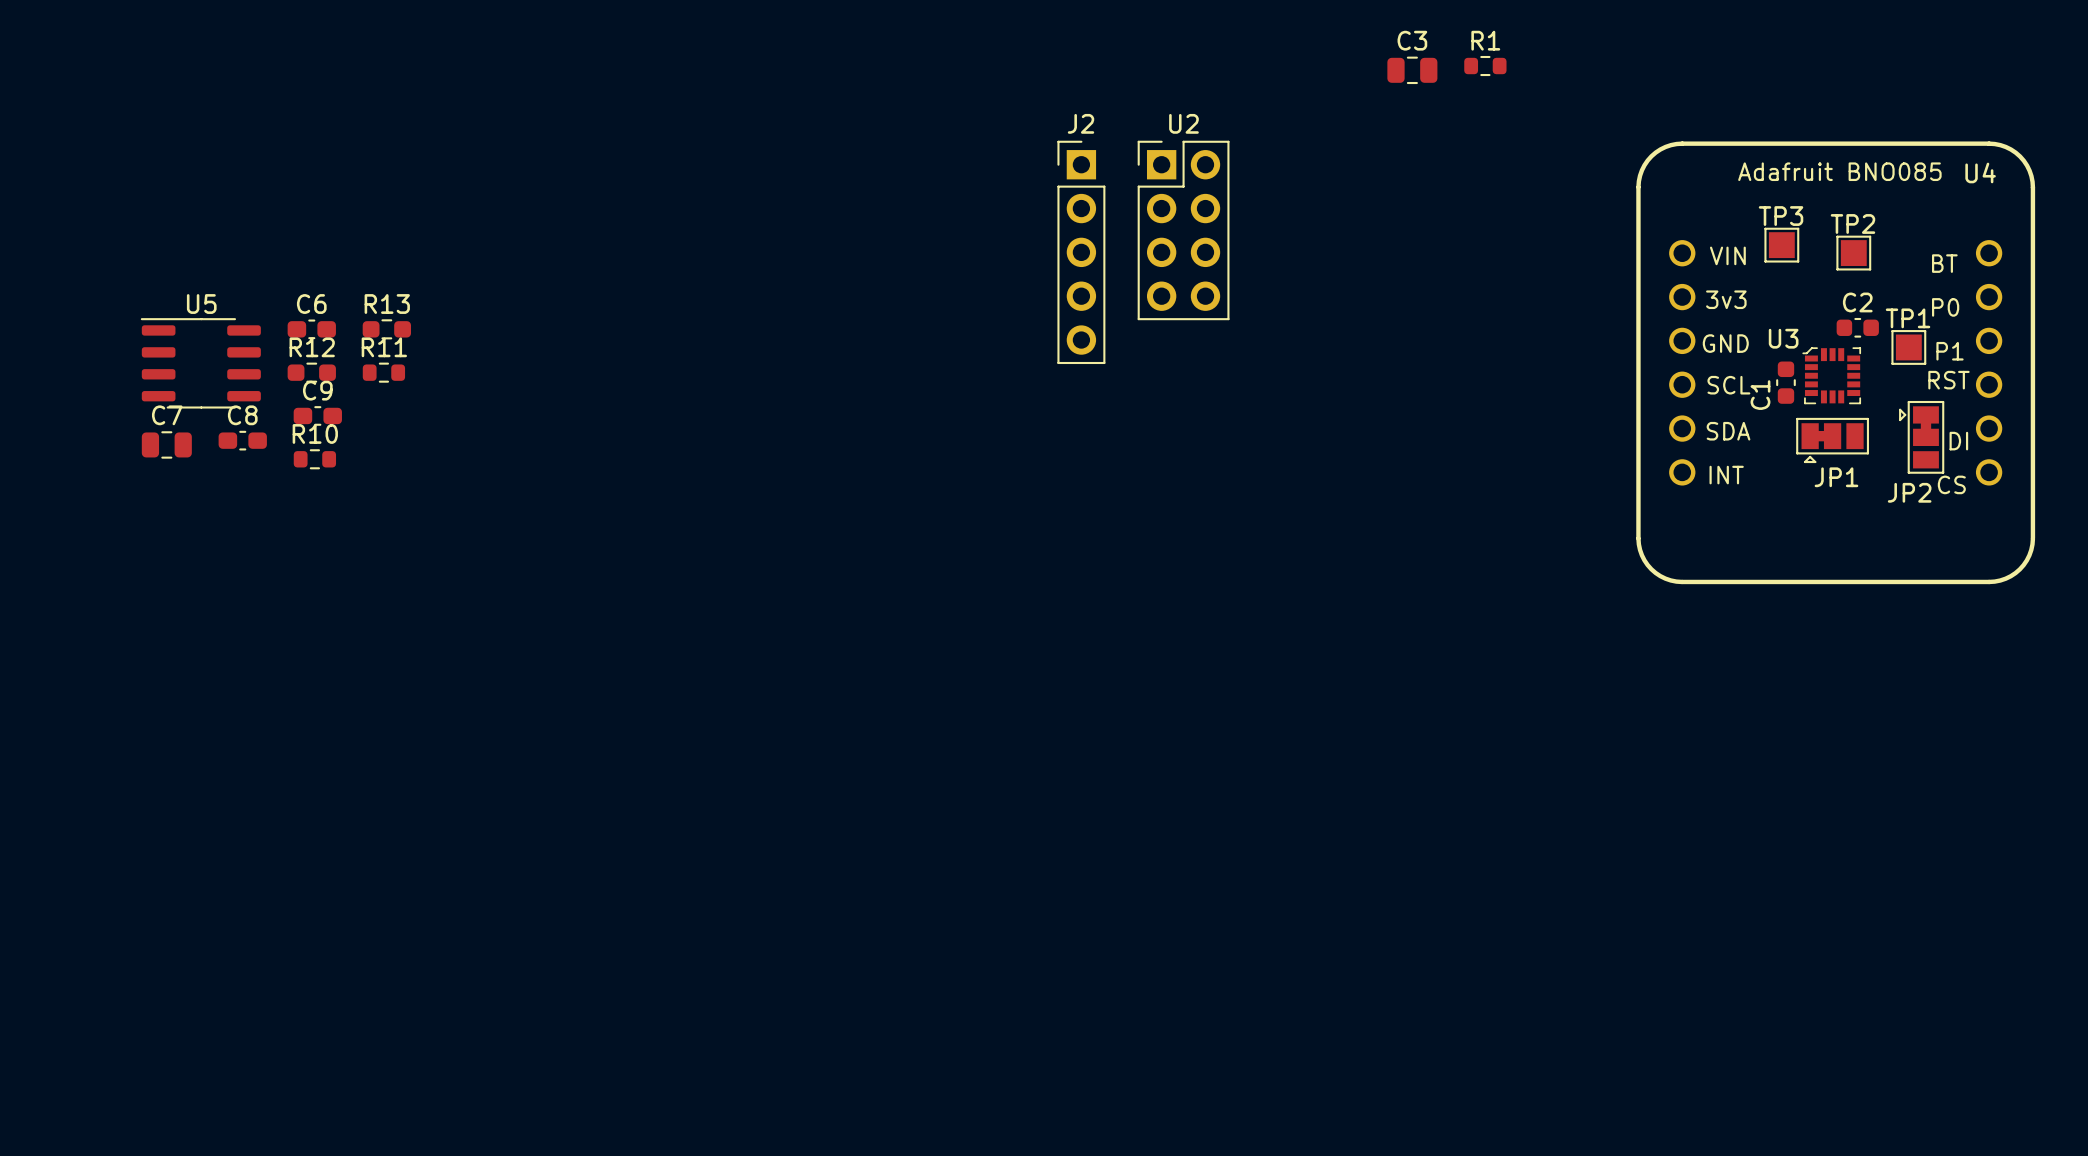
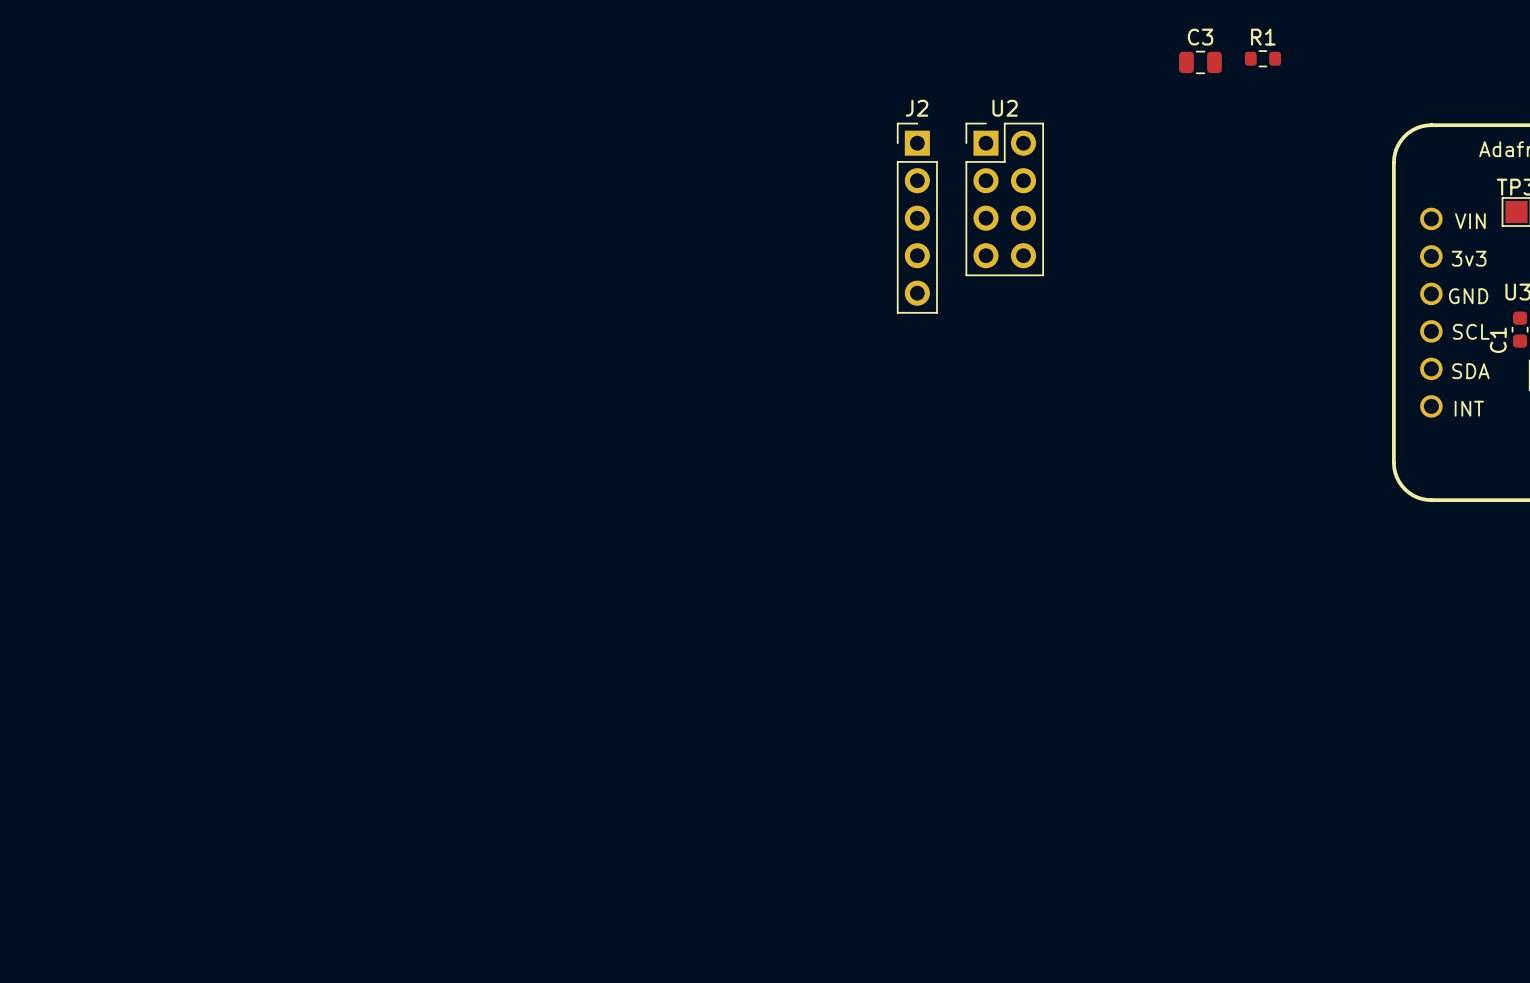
C6: (311, 329) -> none
R13: (386, 329) -> none
U5: (200, 363) -> none
R12: (311, 372) -> none
R11: (383, 372) -> none
C9: (317, 415) -> none
C8: (242, 440) -> none
C7: (166, 444) -> none
R10: (314, 459) -> none

